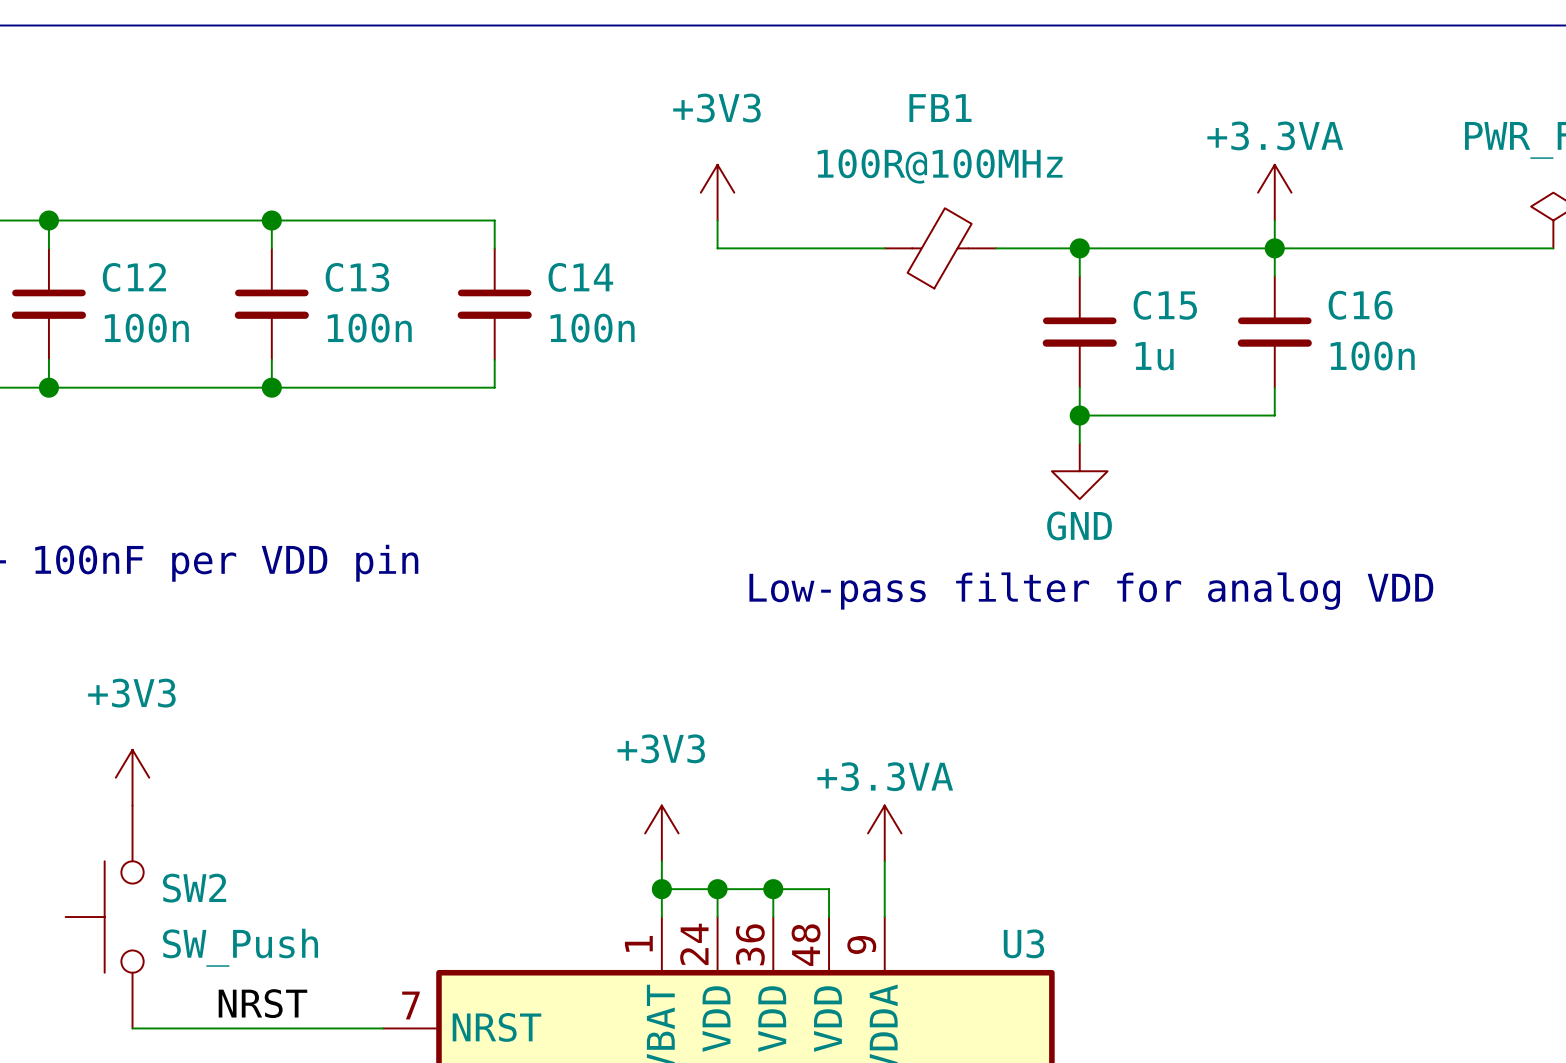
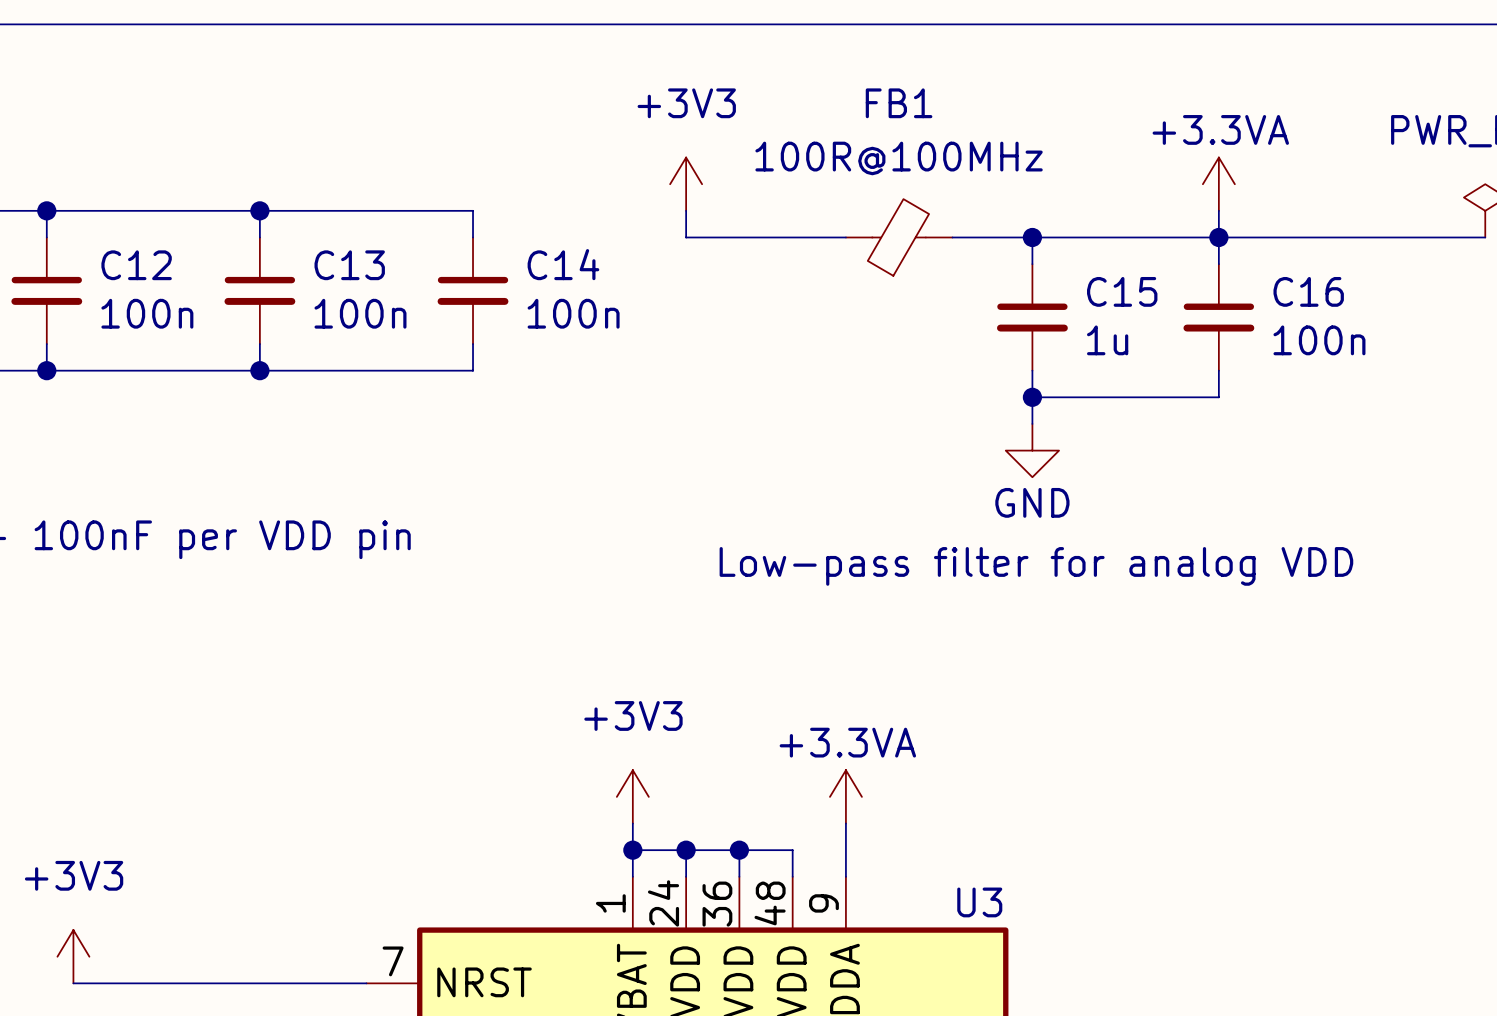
power symbol position: +3V3 (132, 777) -> +3V3 (73, 956)
SW2: SW_Push (104, 917) -> none
label: NRST (262, 1003) -> none
wire: none -> (73, 983) (126, 983)

